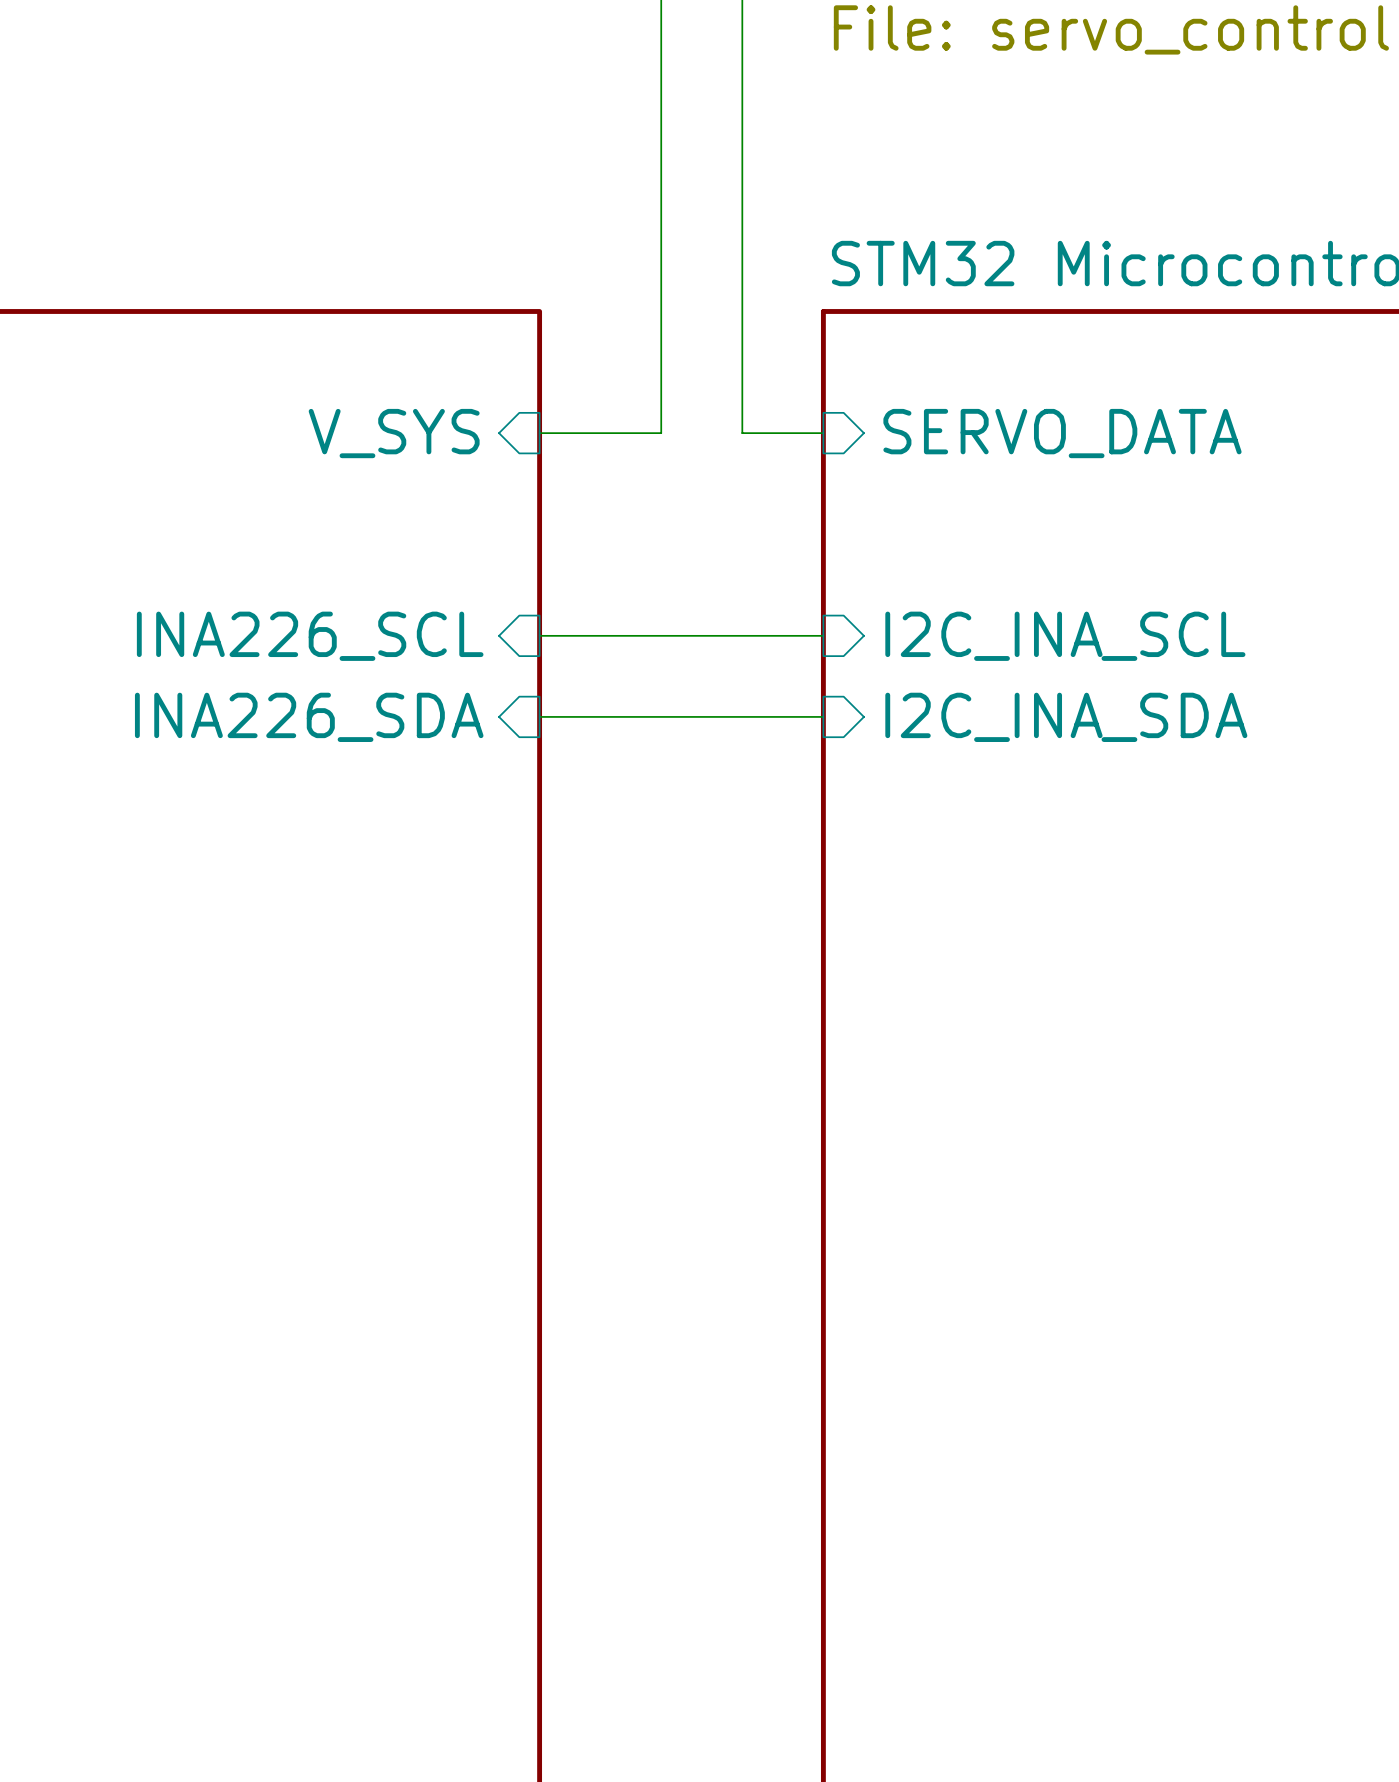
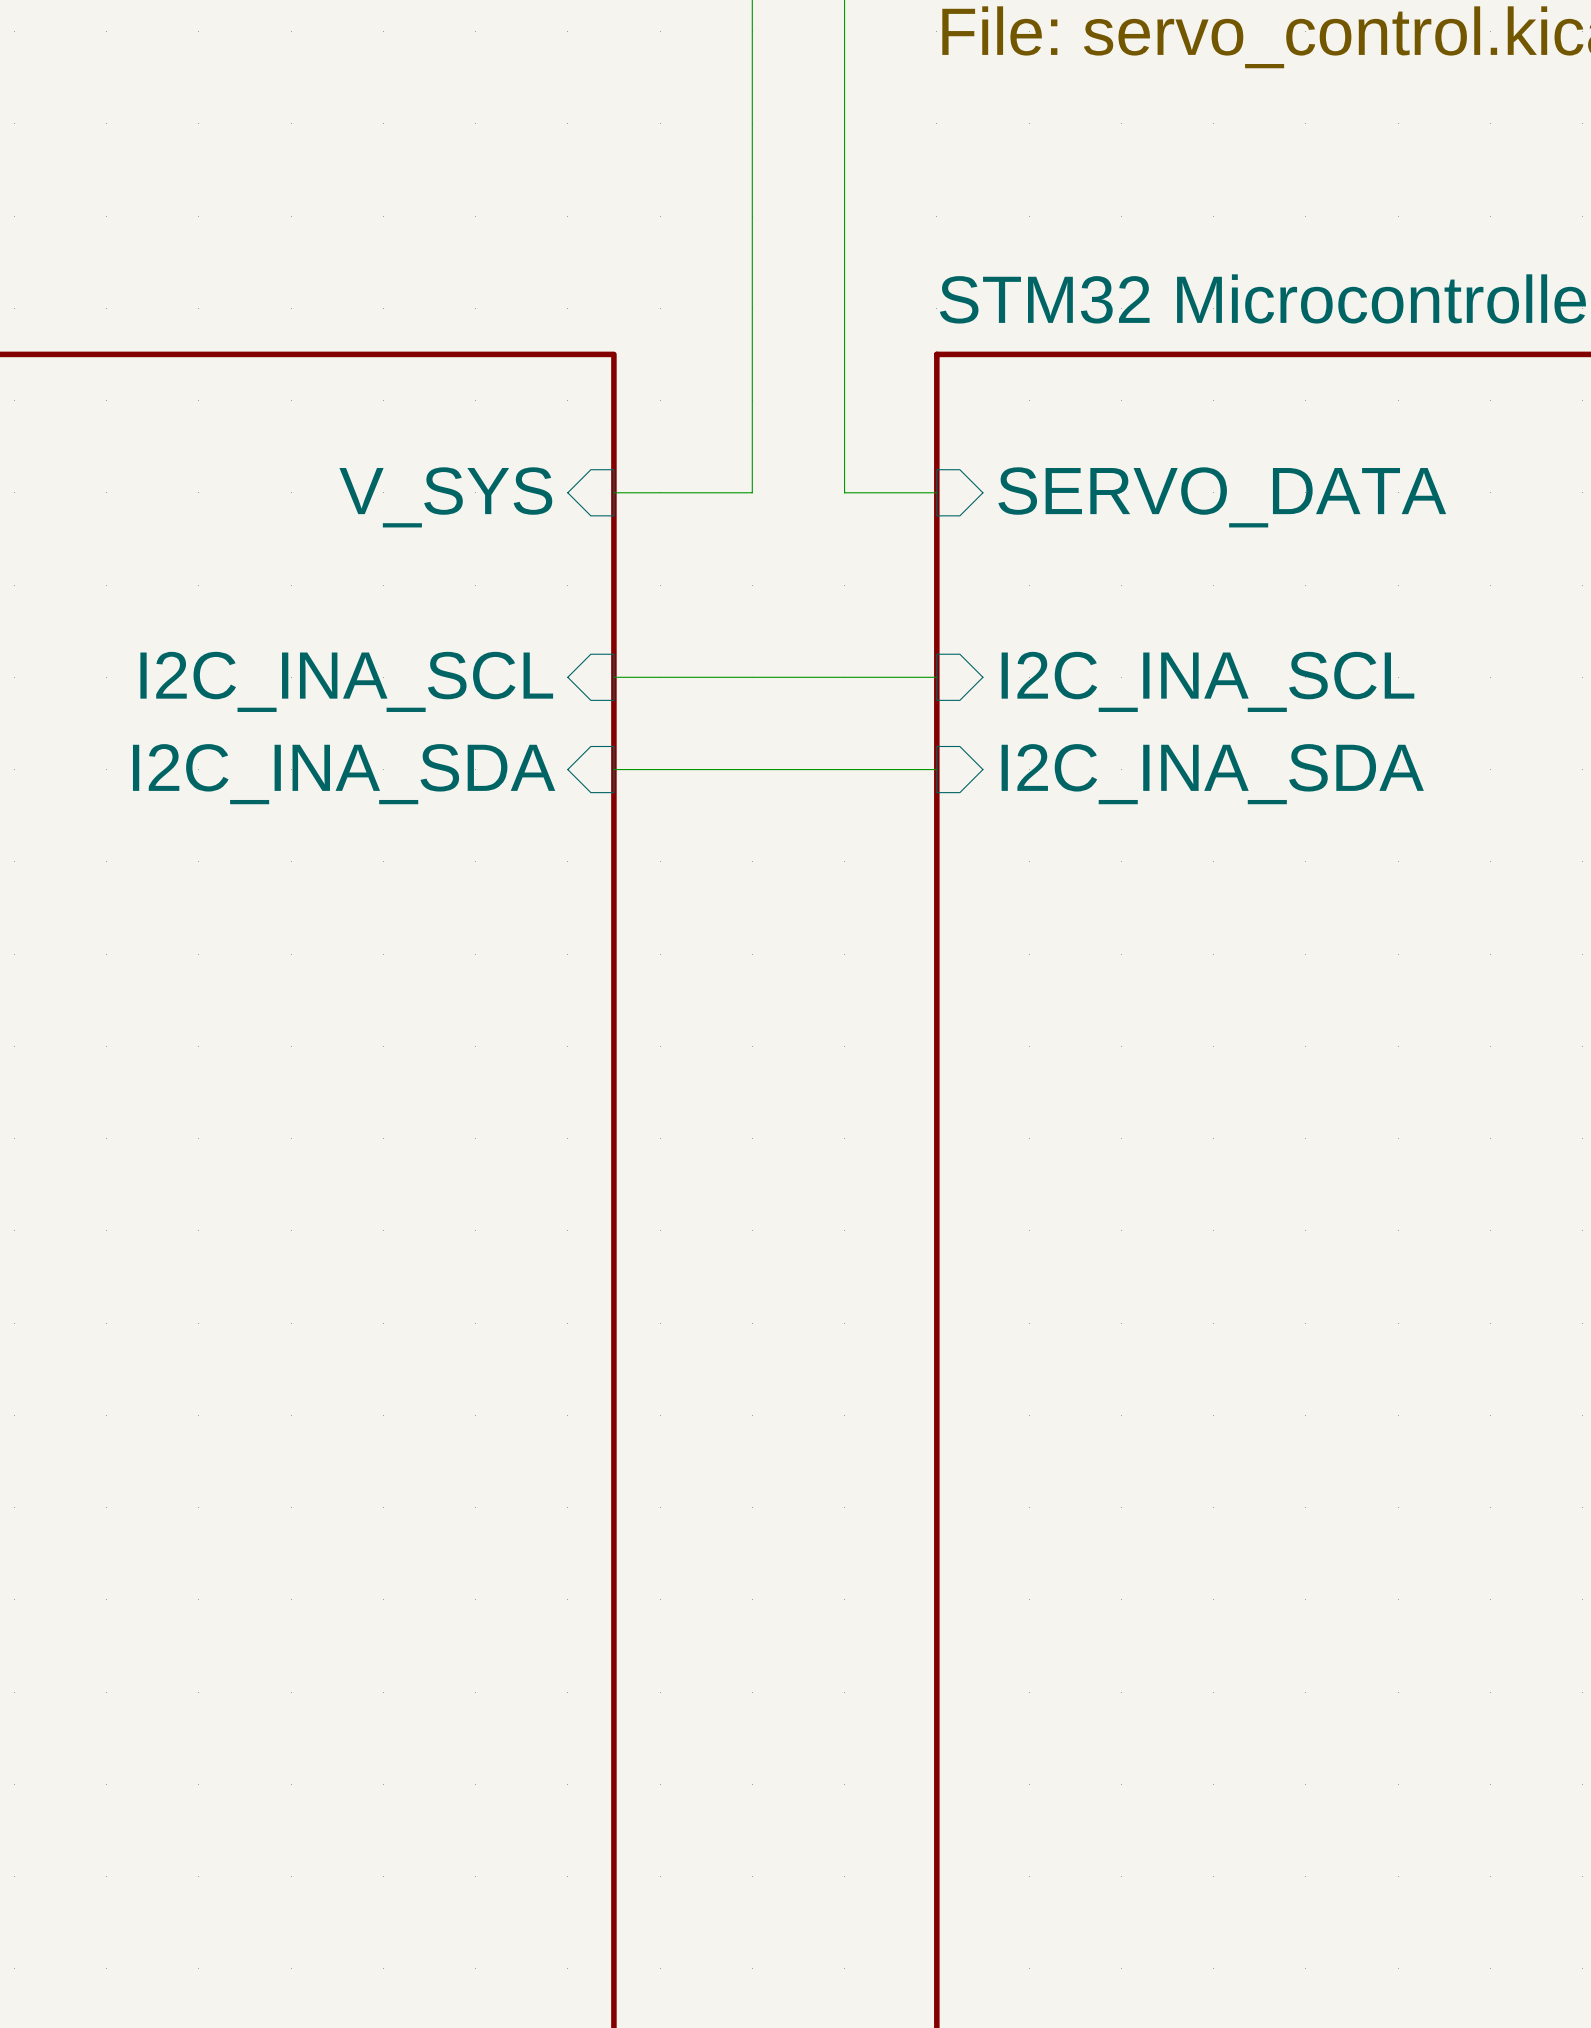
wire: (539, 635) (823, 635) -> (613, 677) (936, 677)
sheet pin: INA226_SCL (310, 636) -> I2C_INA_SCL (346, 681)
sheet pin position: I2C_INA_SCL (1065, 636) -> I2C_INA_SCL (1207, 681)
wire: (539, 716) (823, 716) -> (613, 769) (936, 769)
sheet pin: INA226_SDA (309, 717) -> I2C_INA_SDA (344, 774)
sheet pin position: I2C_INA_SDA (1066, 717) -> I2C_INA_SDA (1212, 774)

